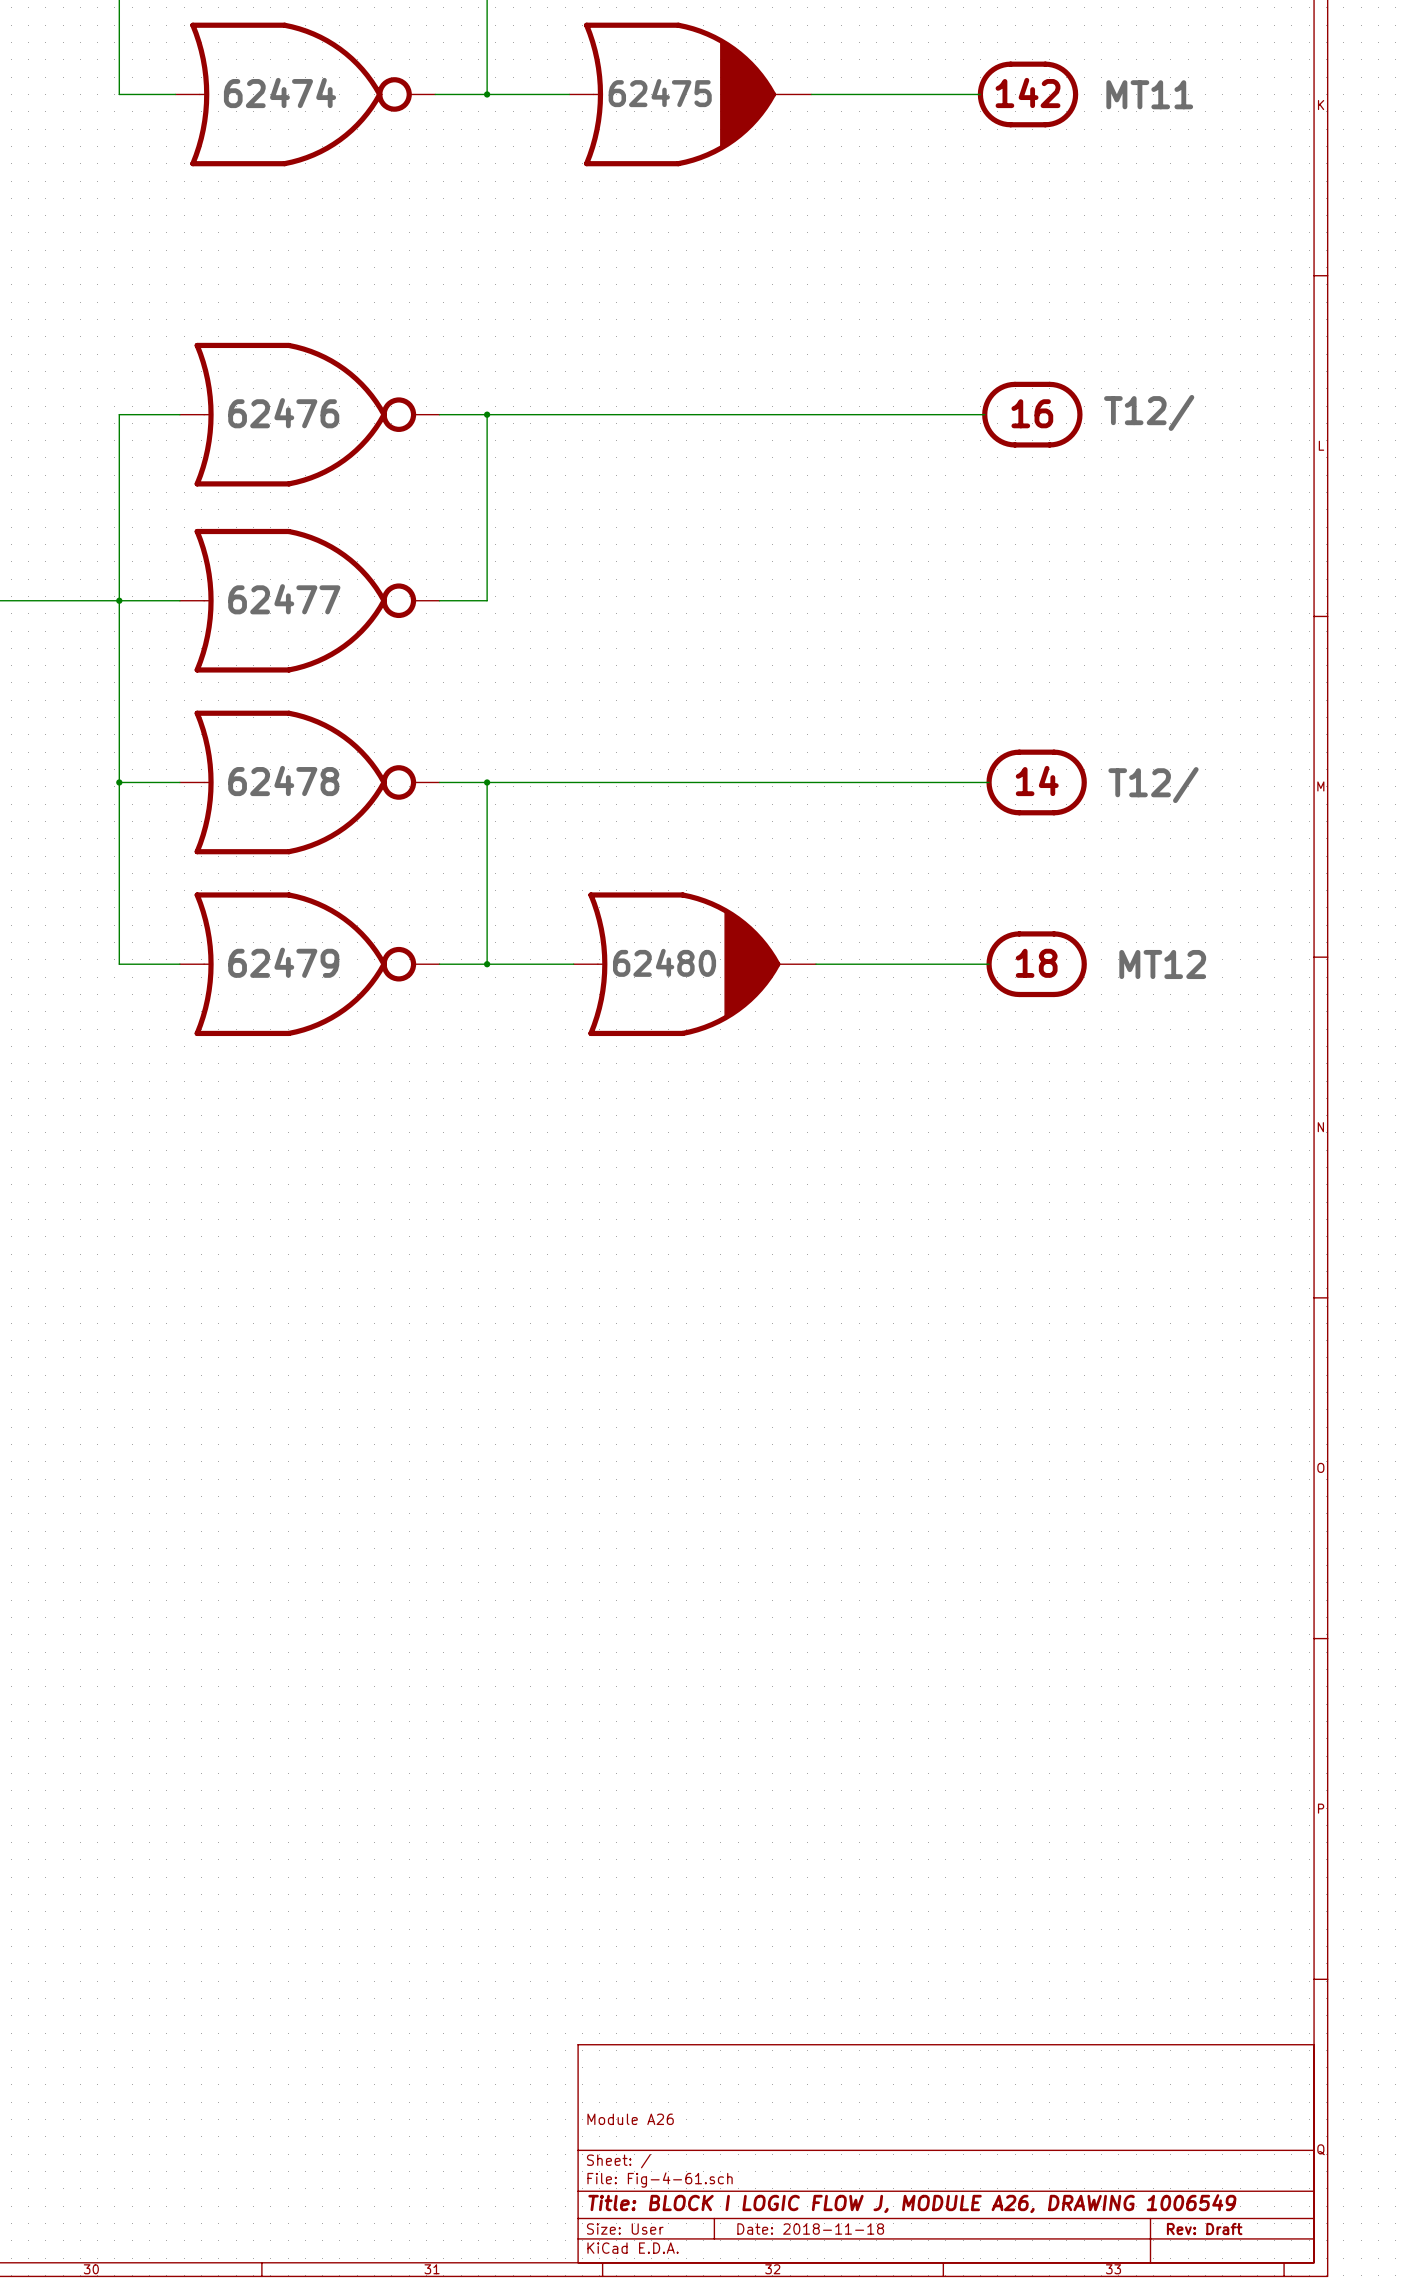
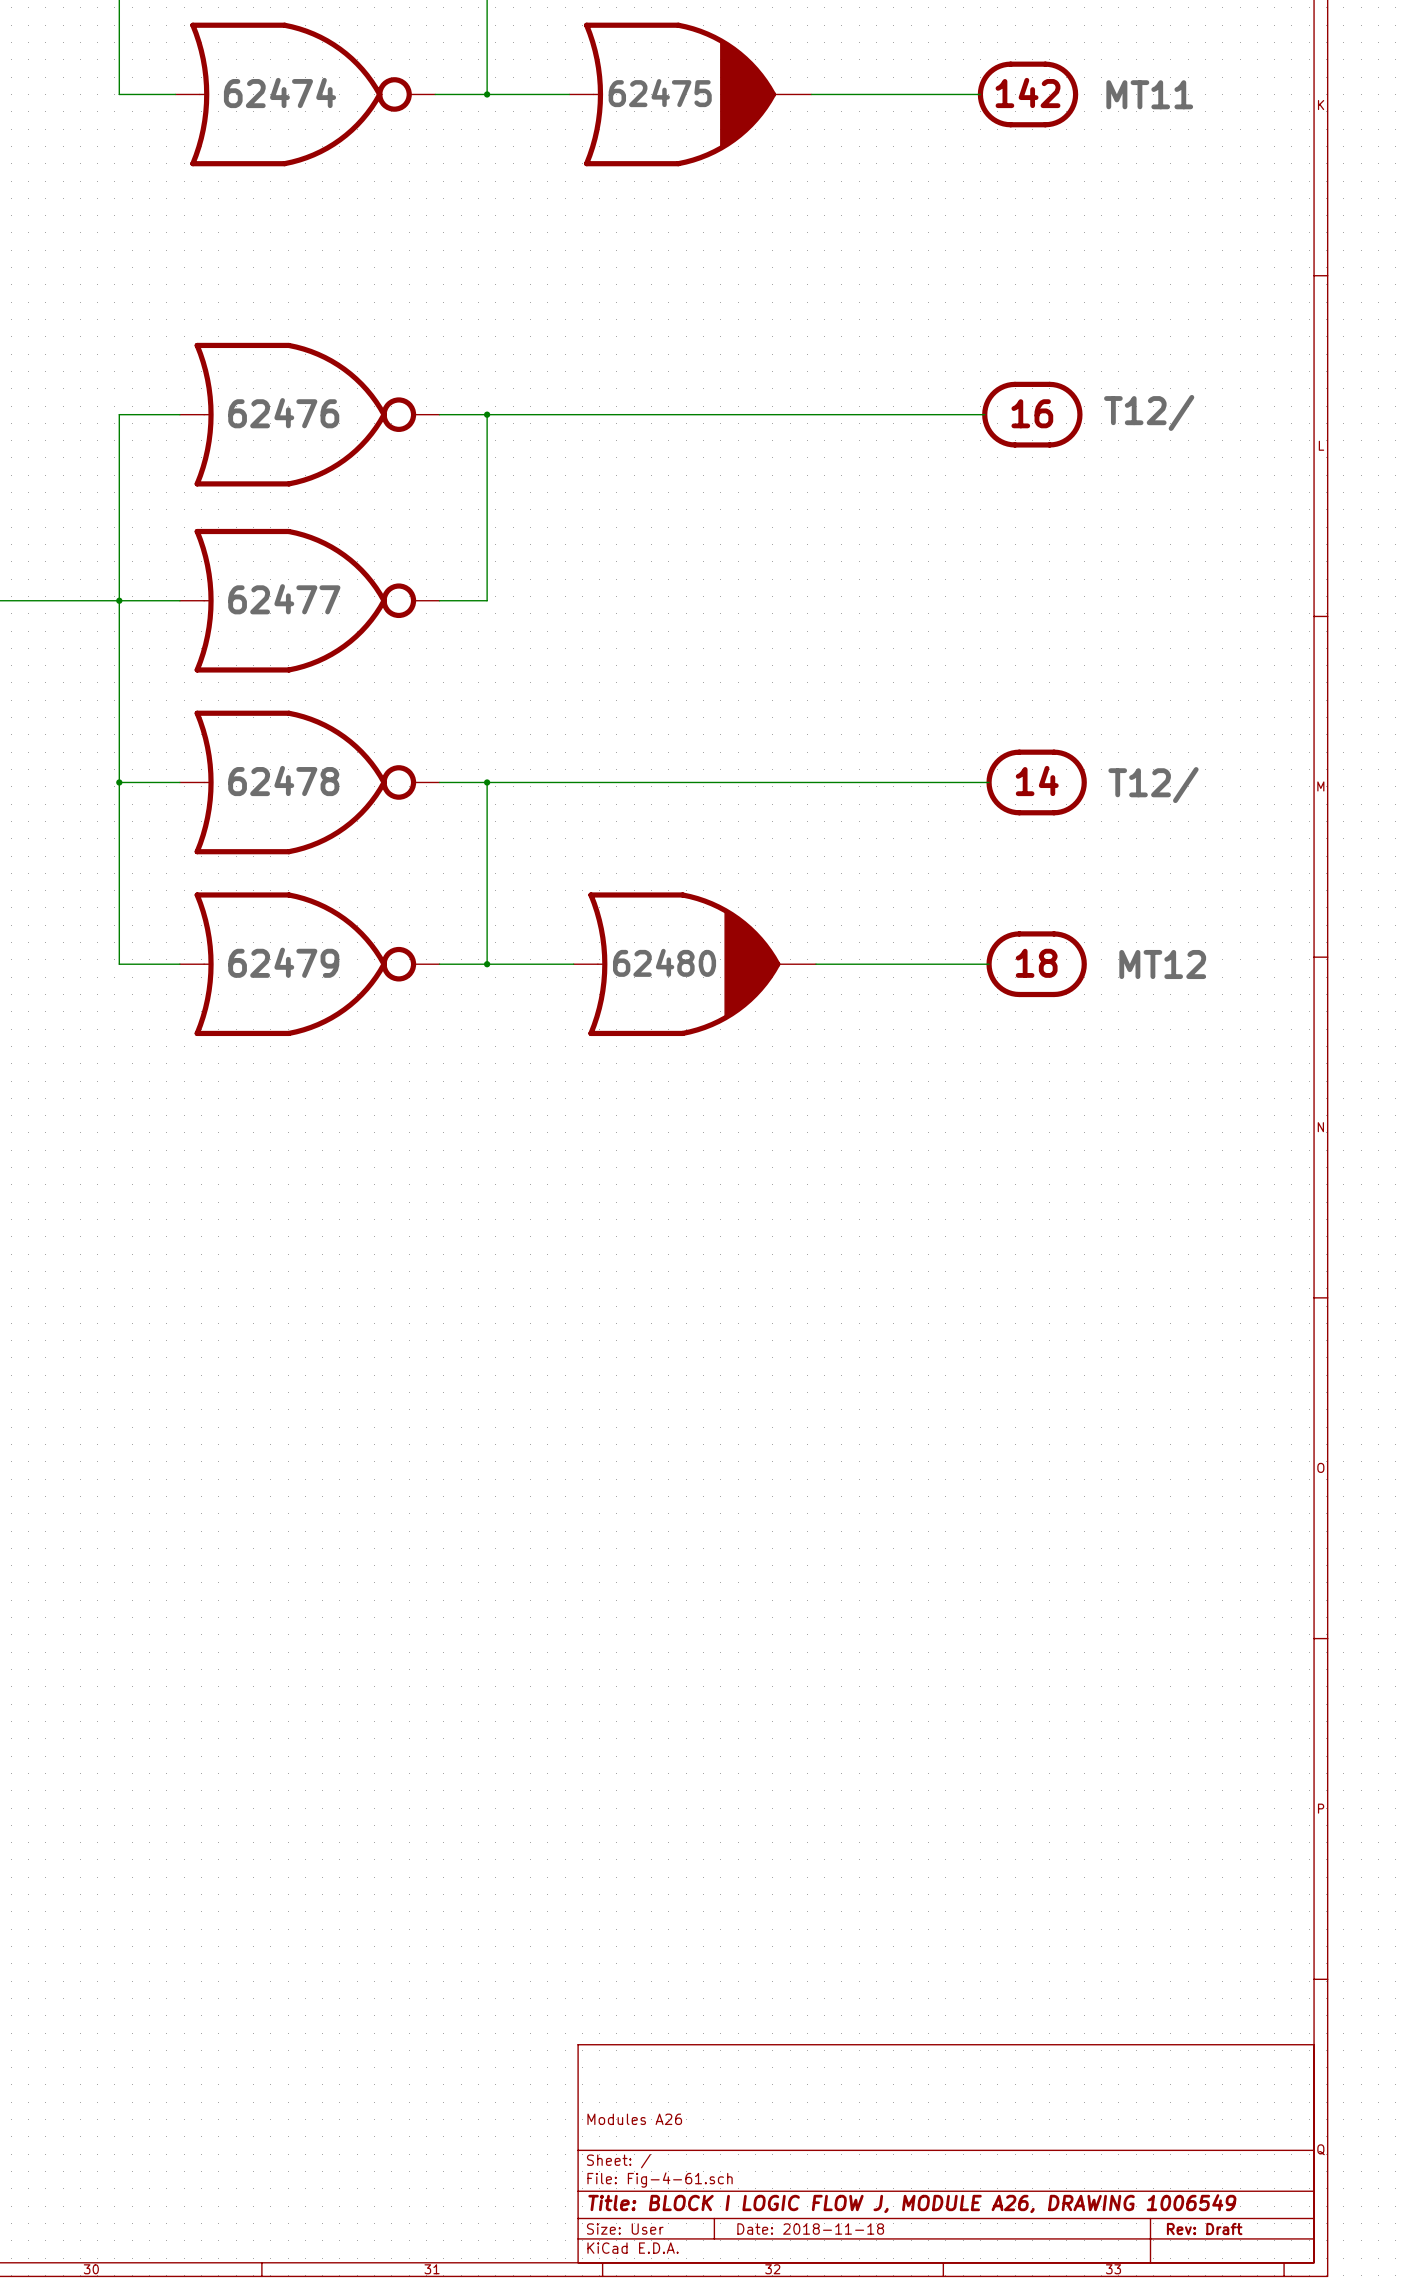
title block: Module A26 (630, 2119) -> Modules A26 (634, 2119)

